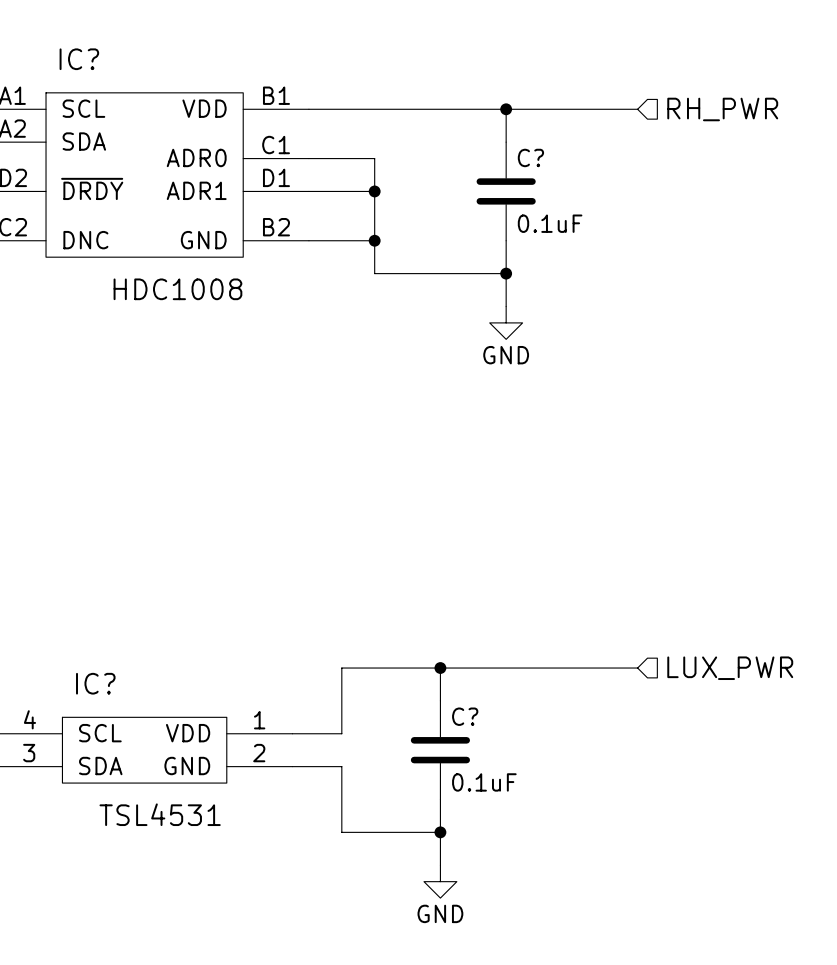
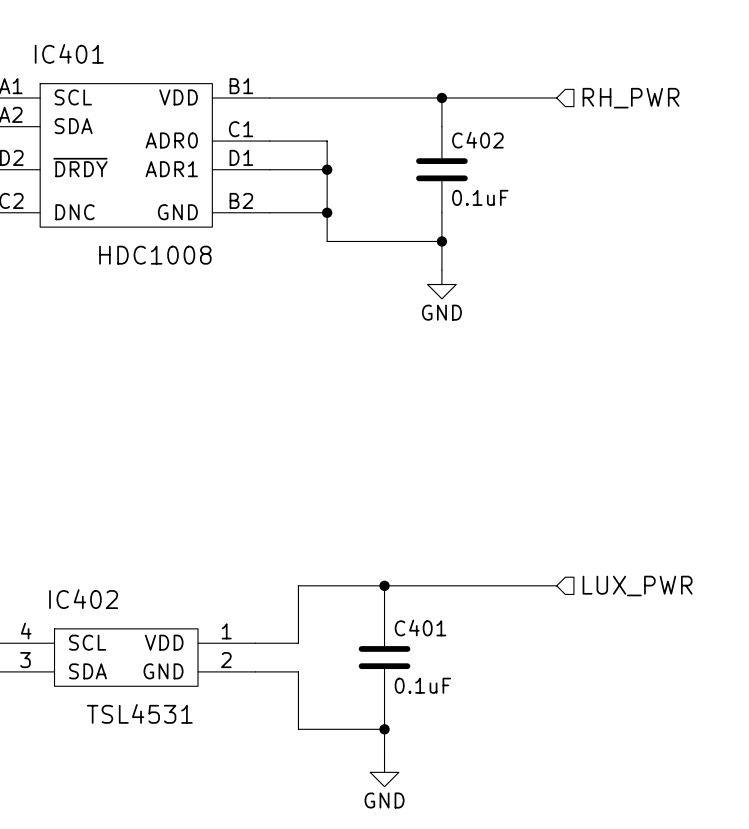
IC? name: IC? (79, 59) -> IC401 (69, 53)
C? name: C? (530, 157) -> C402 (477, 140)
IC? name: IC? (95, 683) -> IC402 (83, 599)
C? name: C? (465, 716) -> C401 (420, 627)

